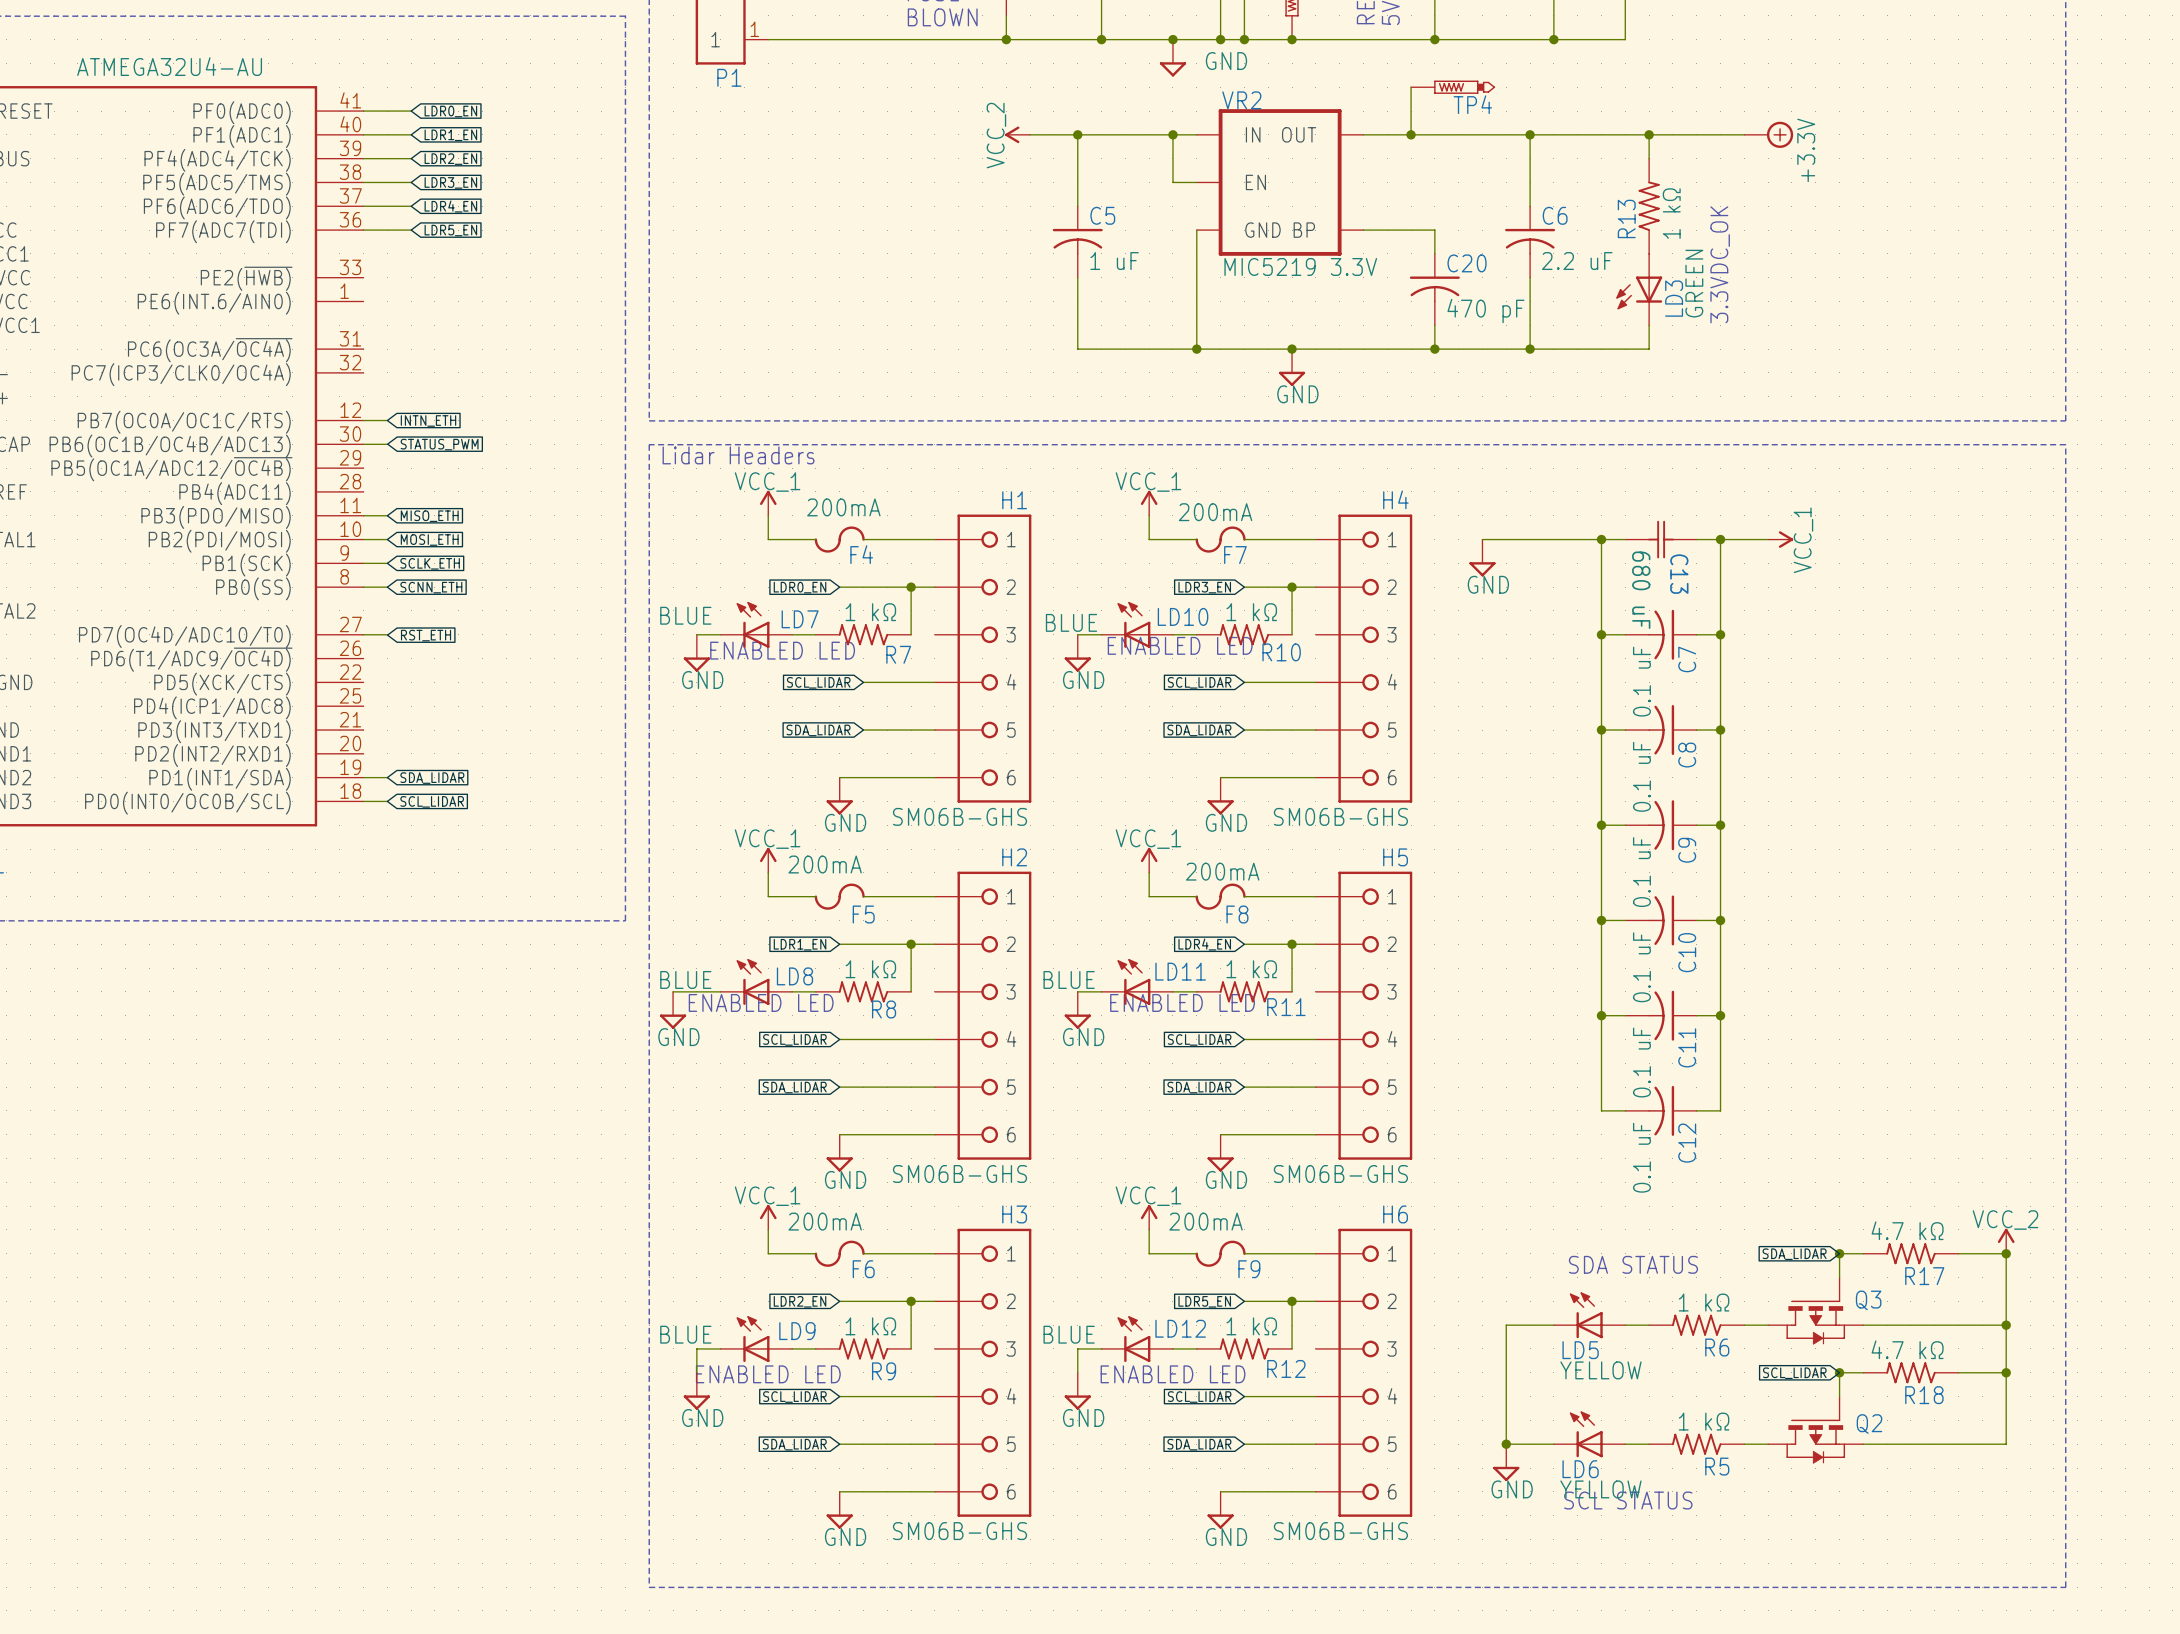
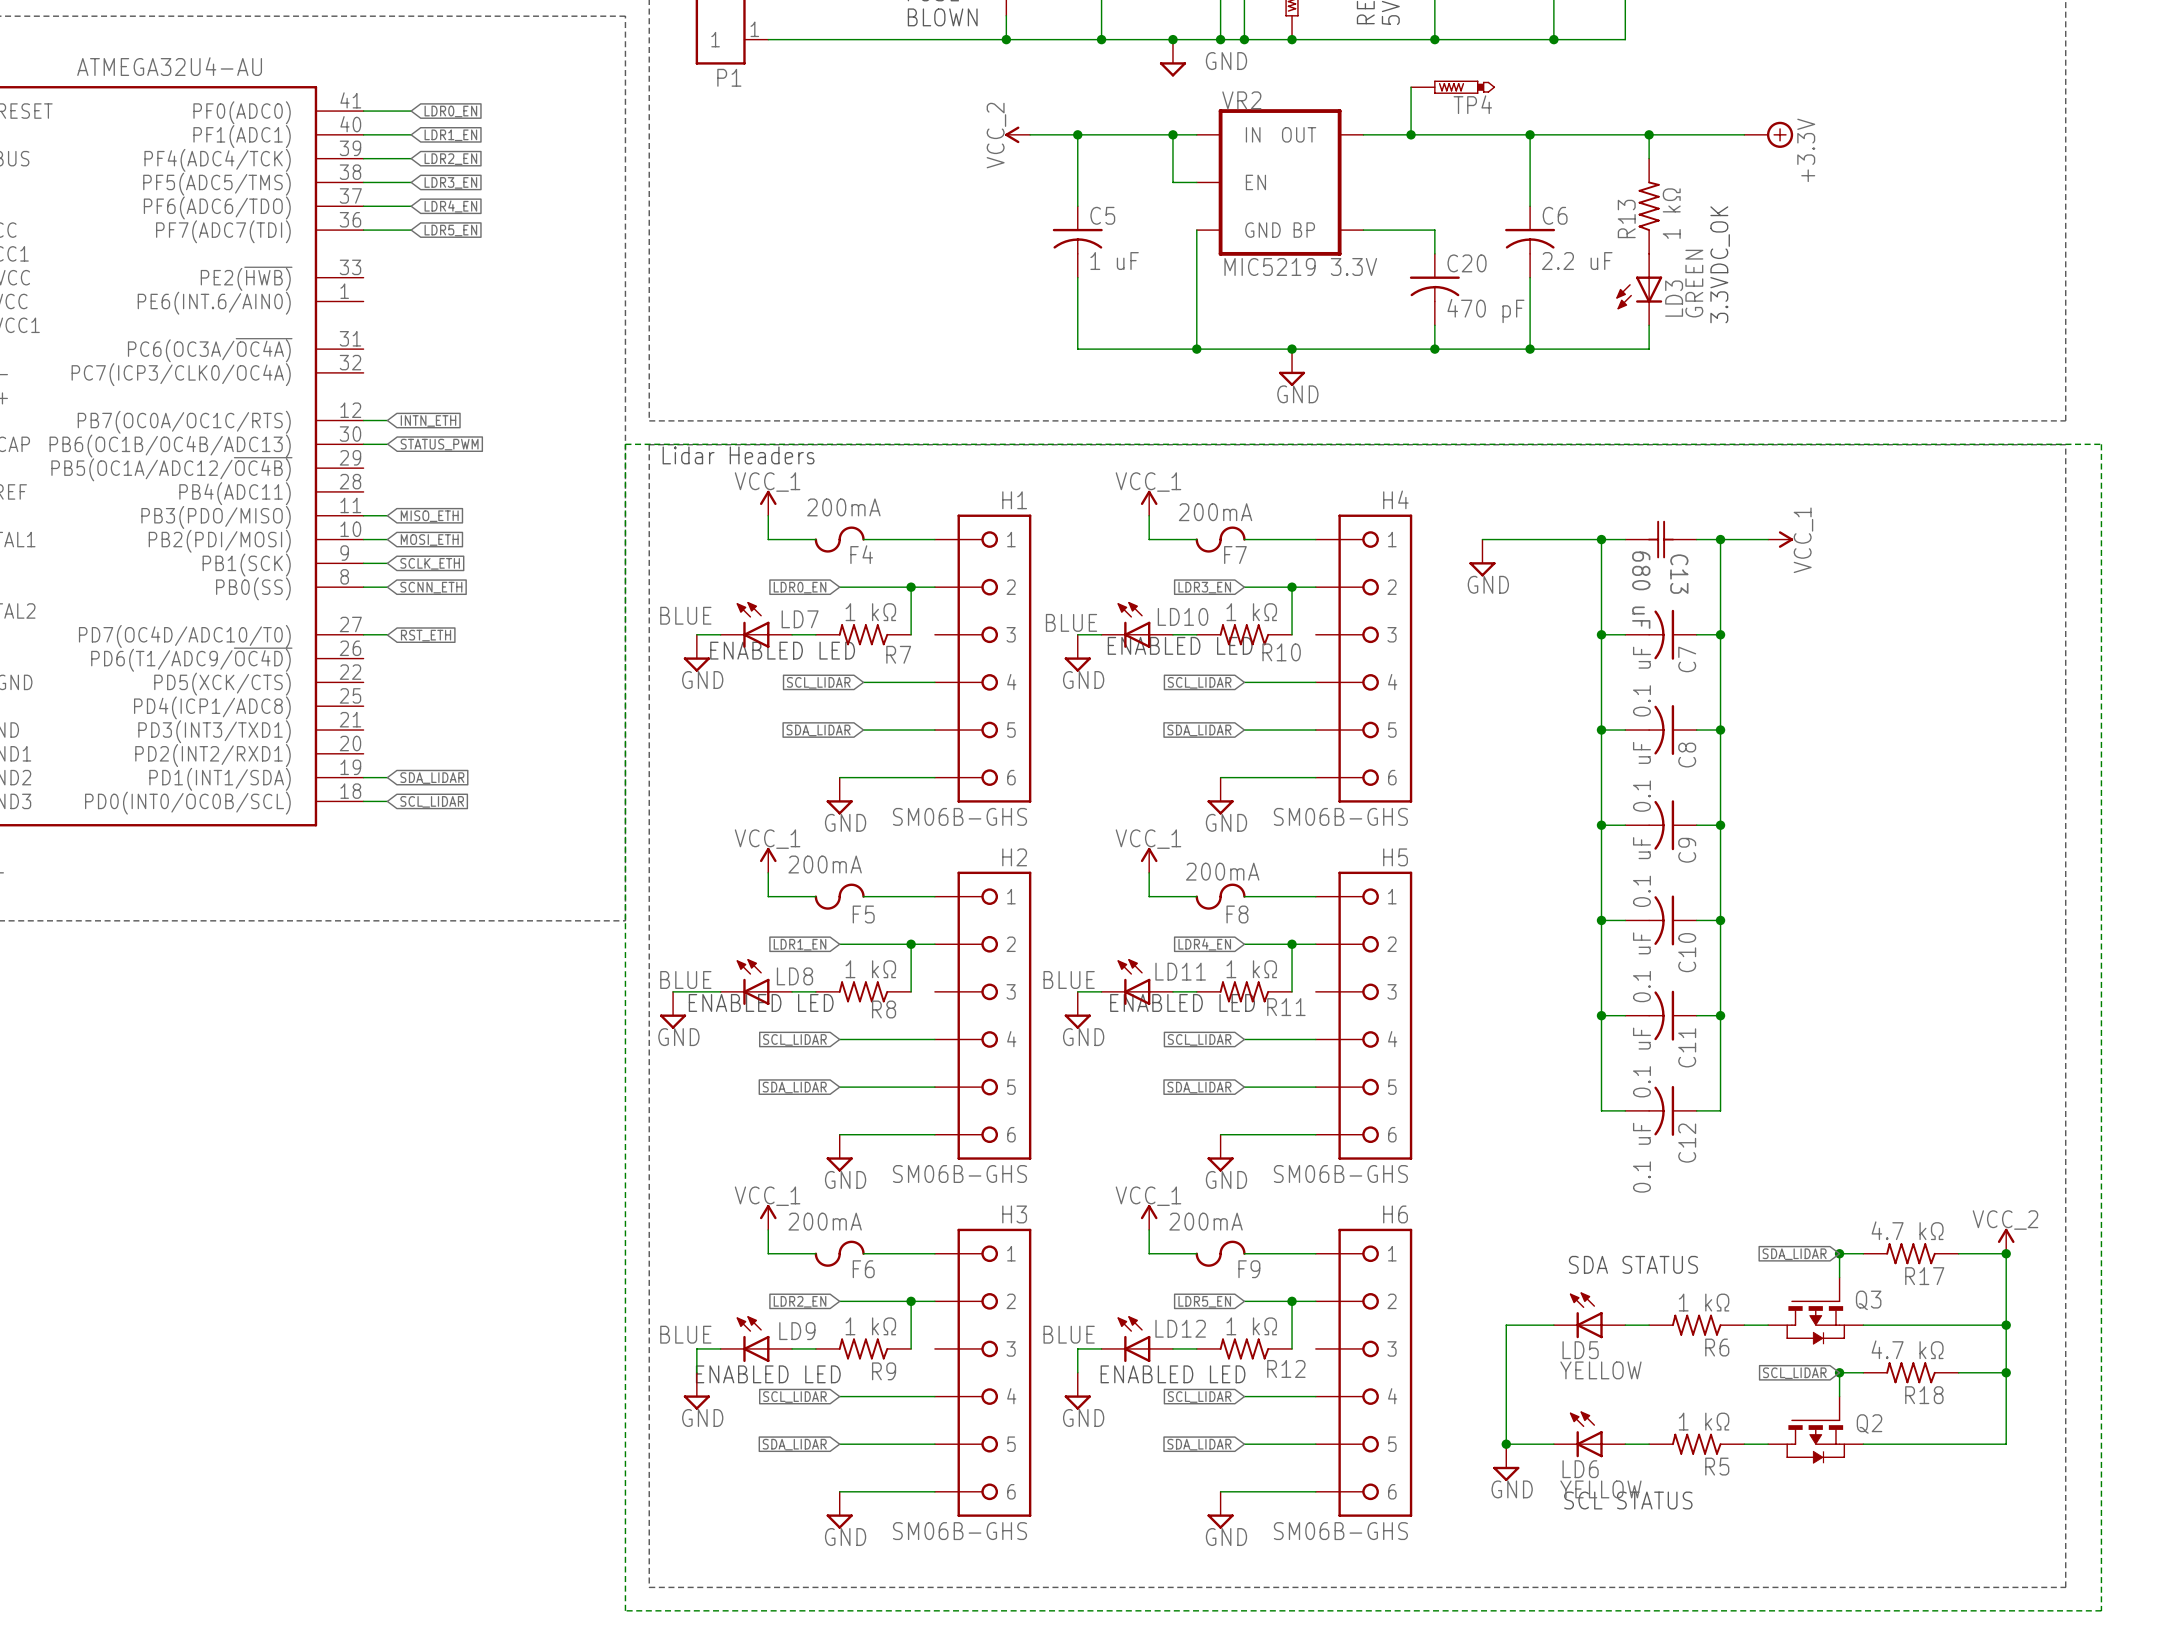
wire: none -> (625, 444) (2101, 444) (2101, 1610) (625, 1610) (625, 444)

